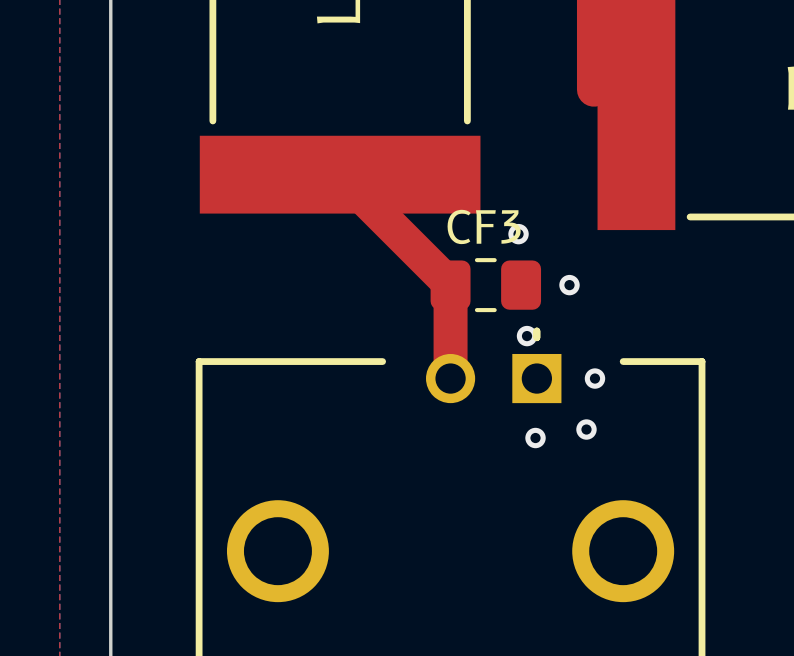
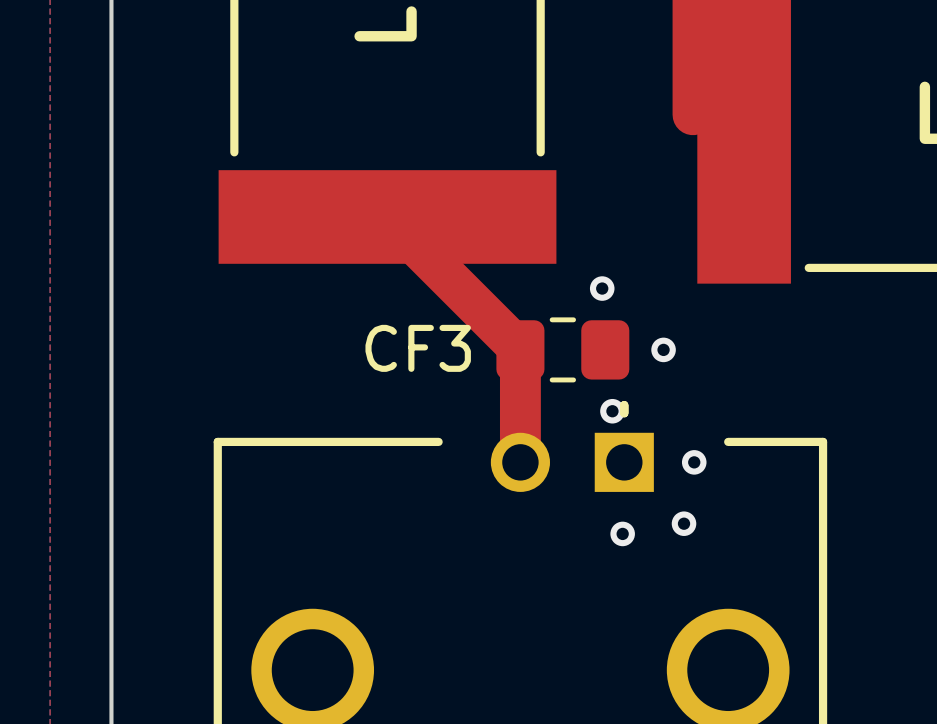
CF3 name position: CF3 (484, 226) -> CF3 (418, 348)

